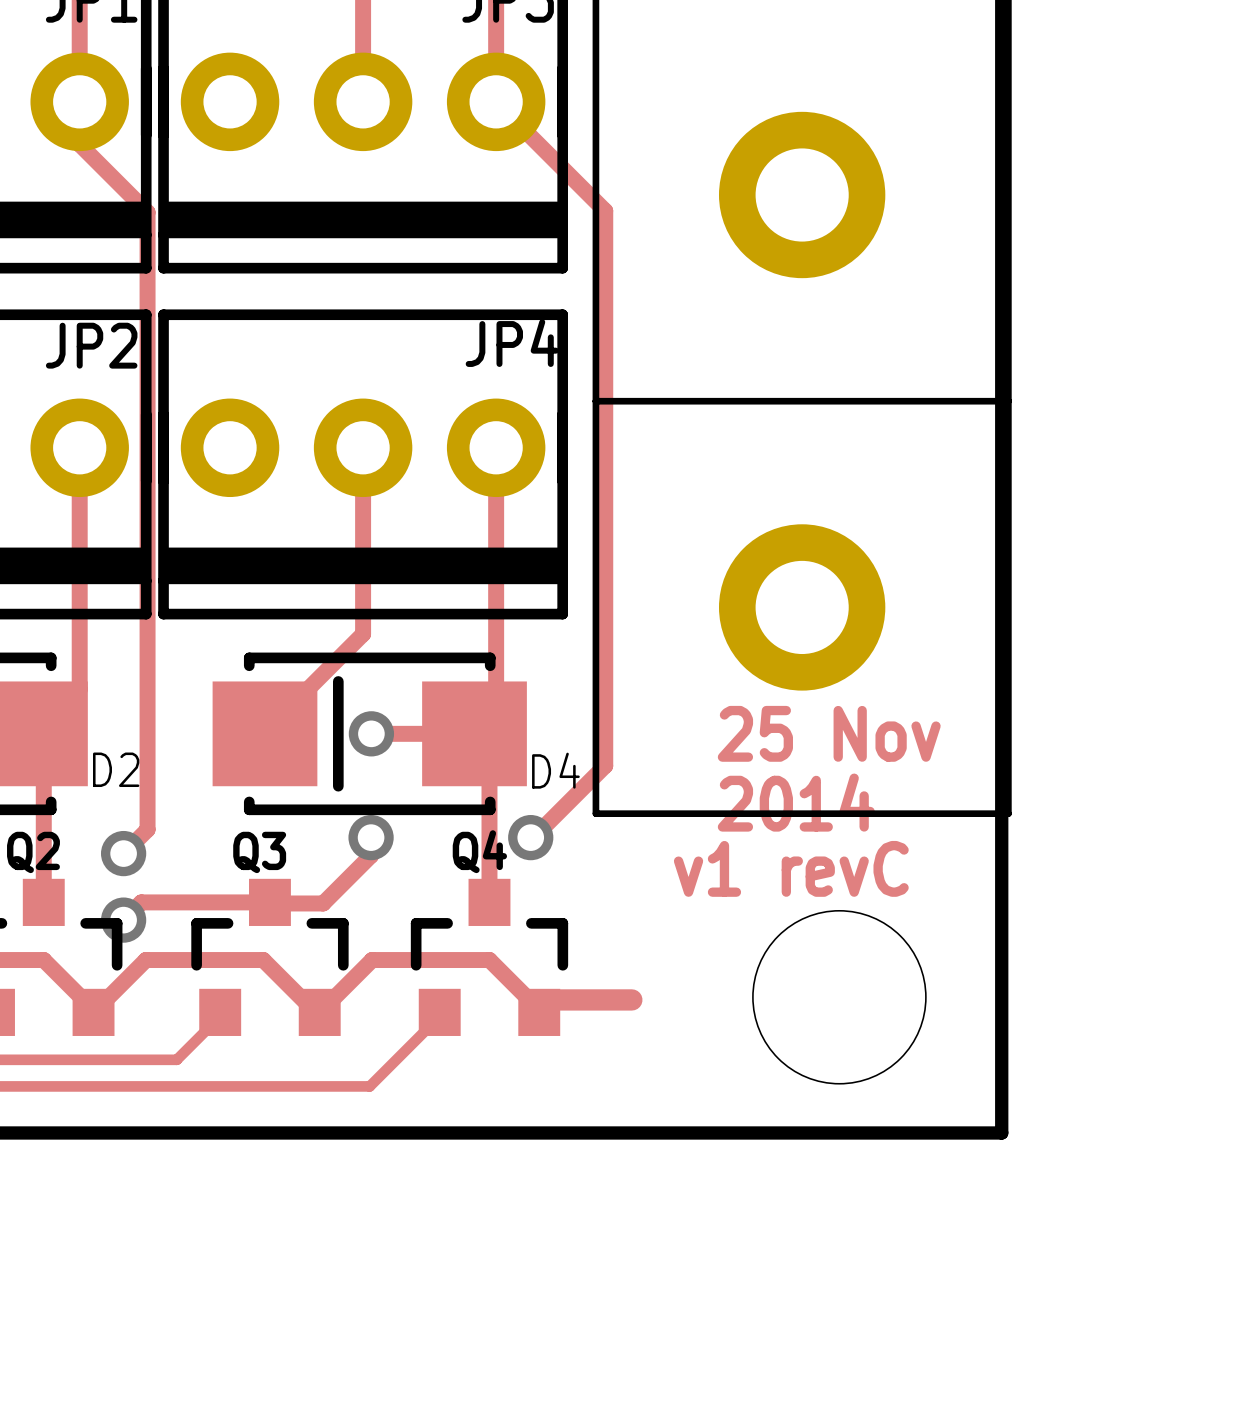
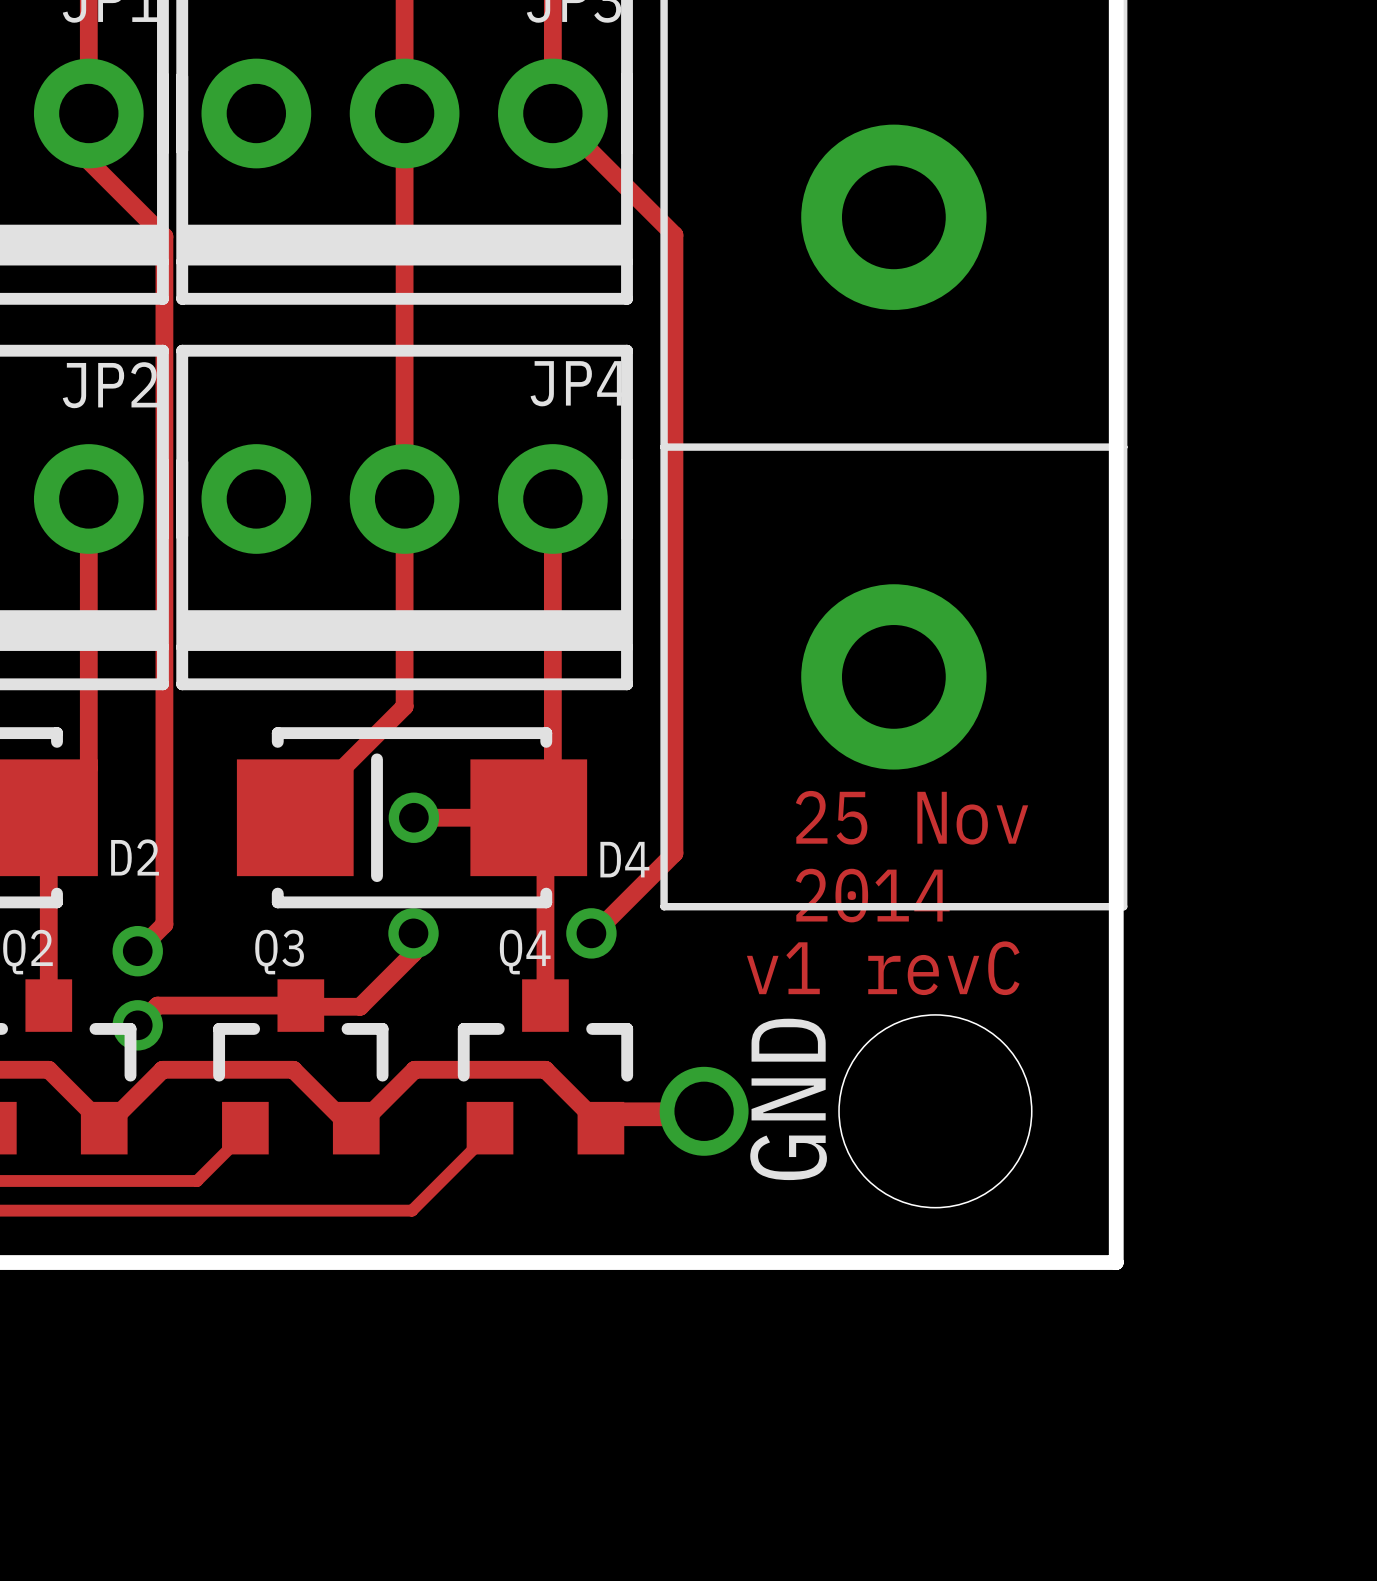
track: none -> (404, 113) (404, 498)
GND: none -> (704, 1111)

